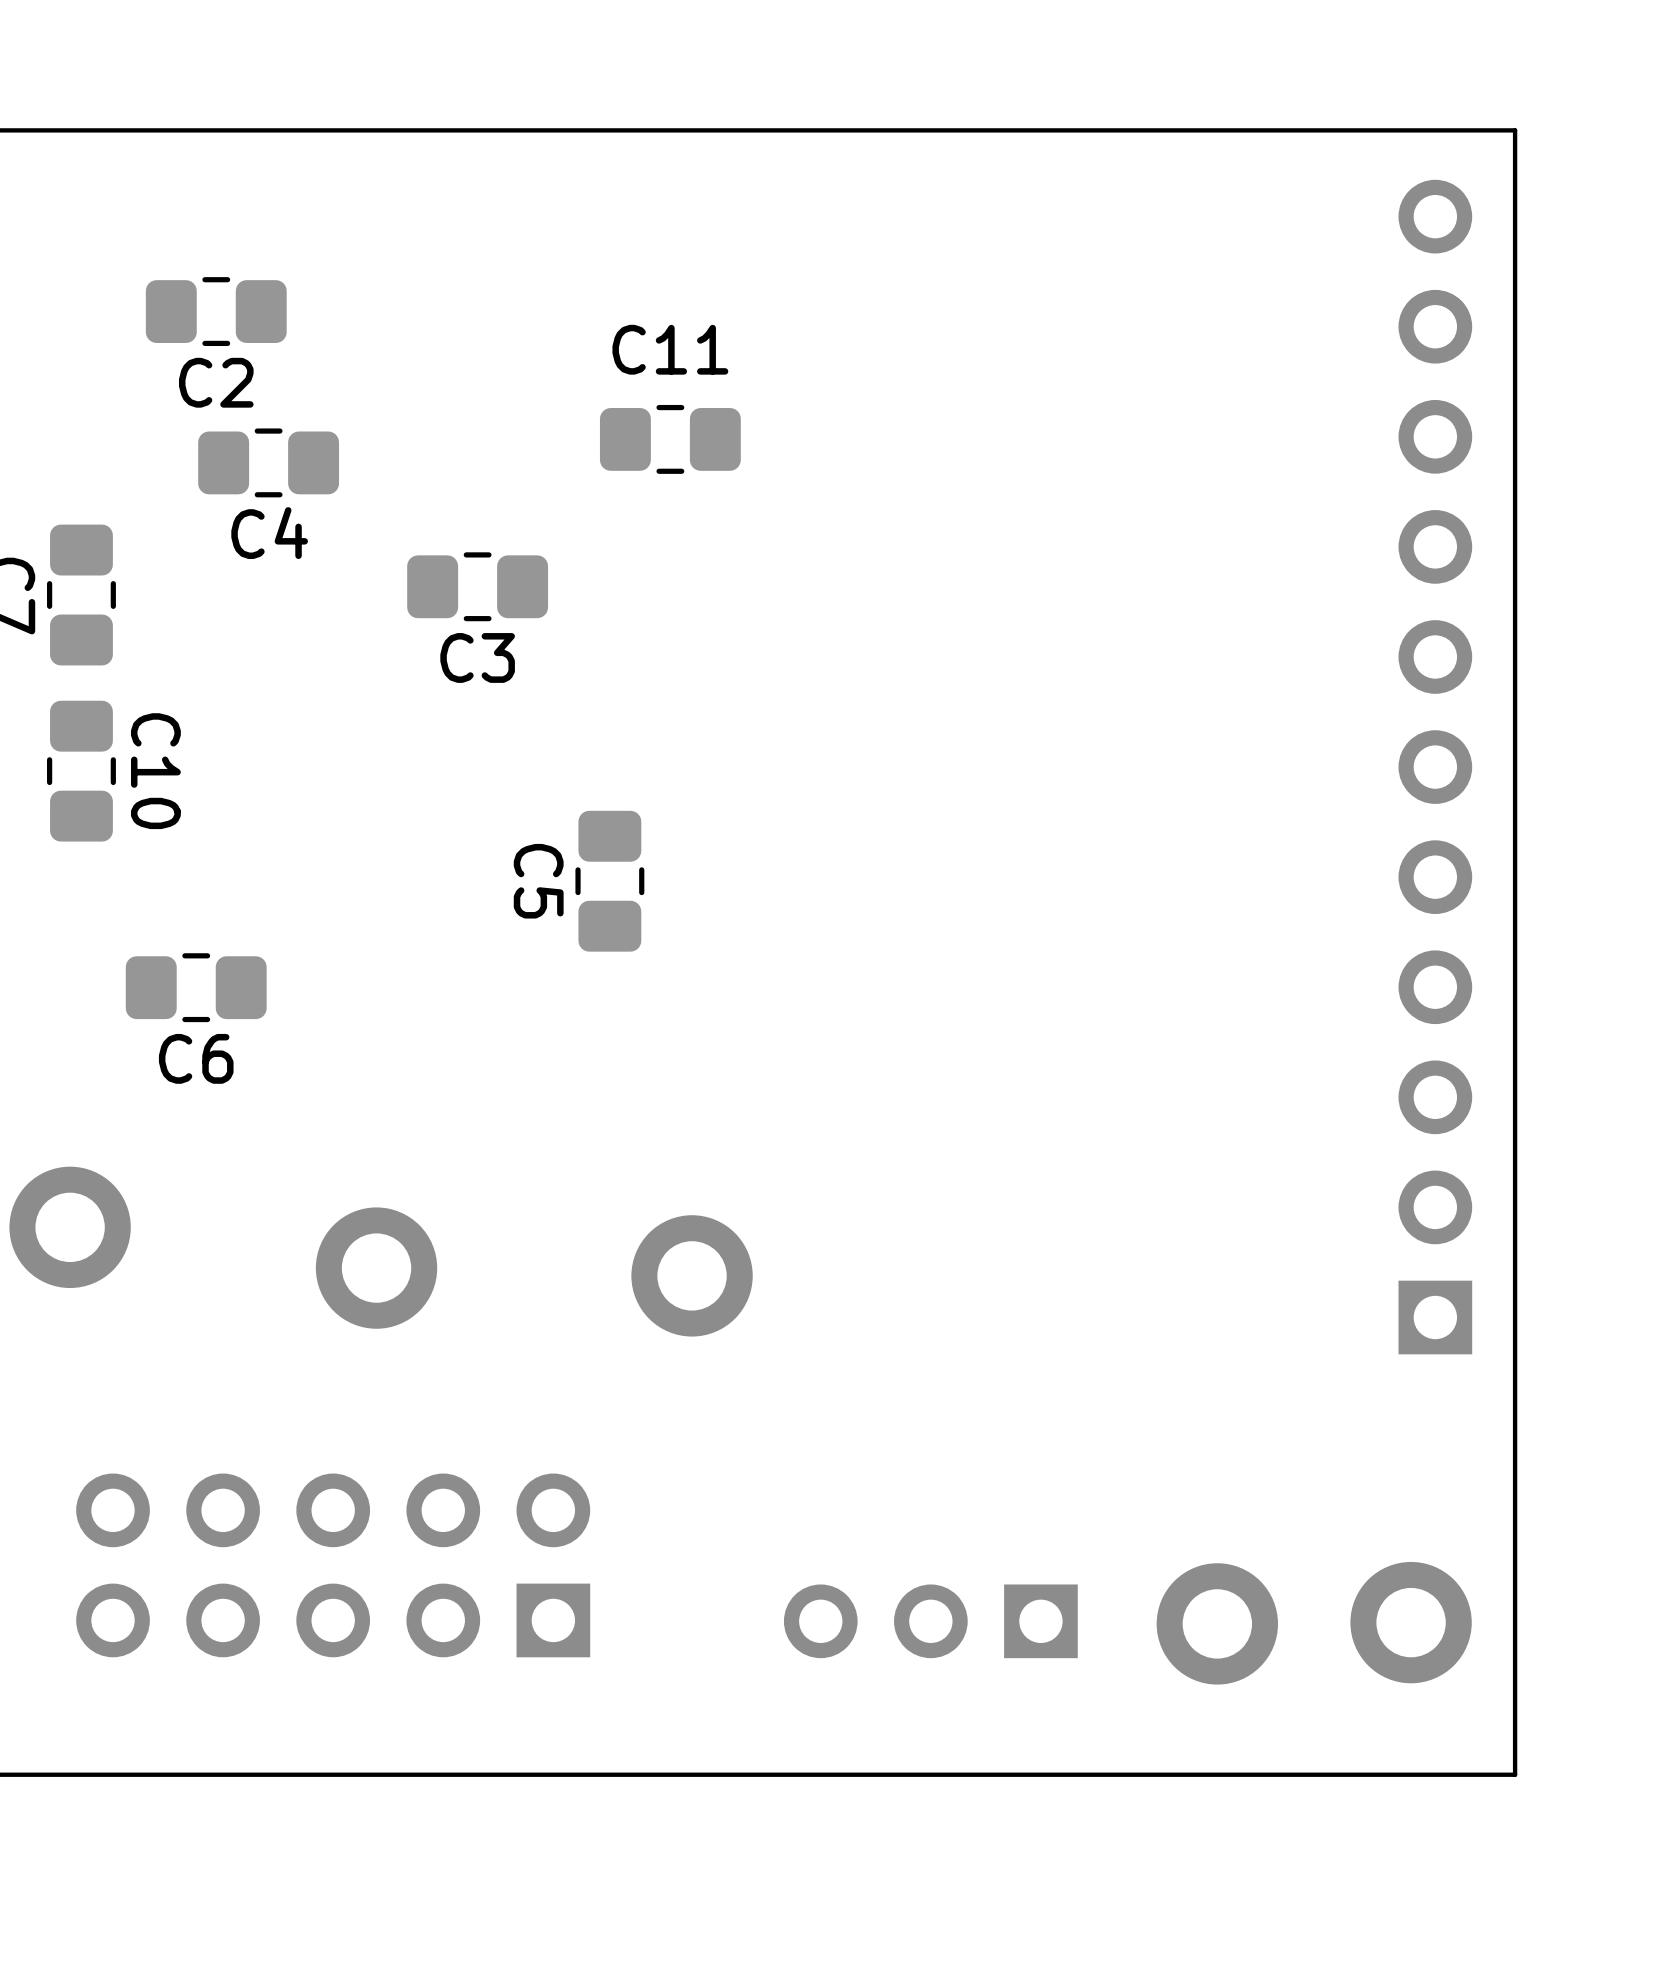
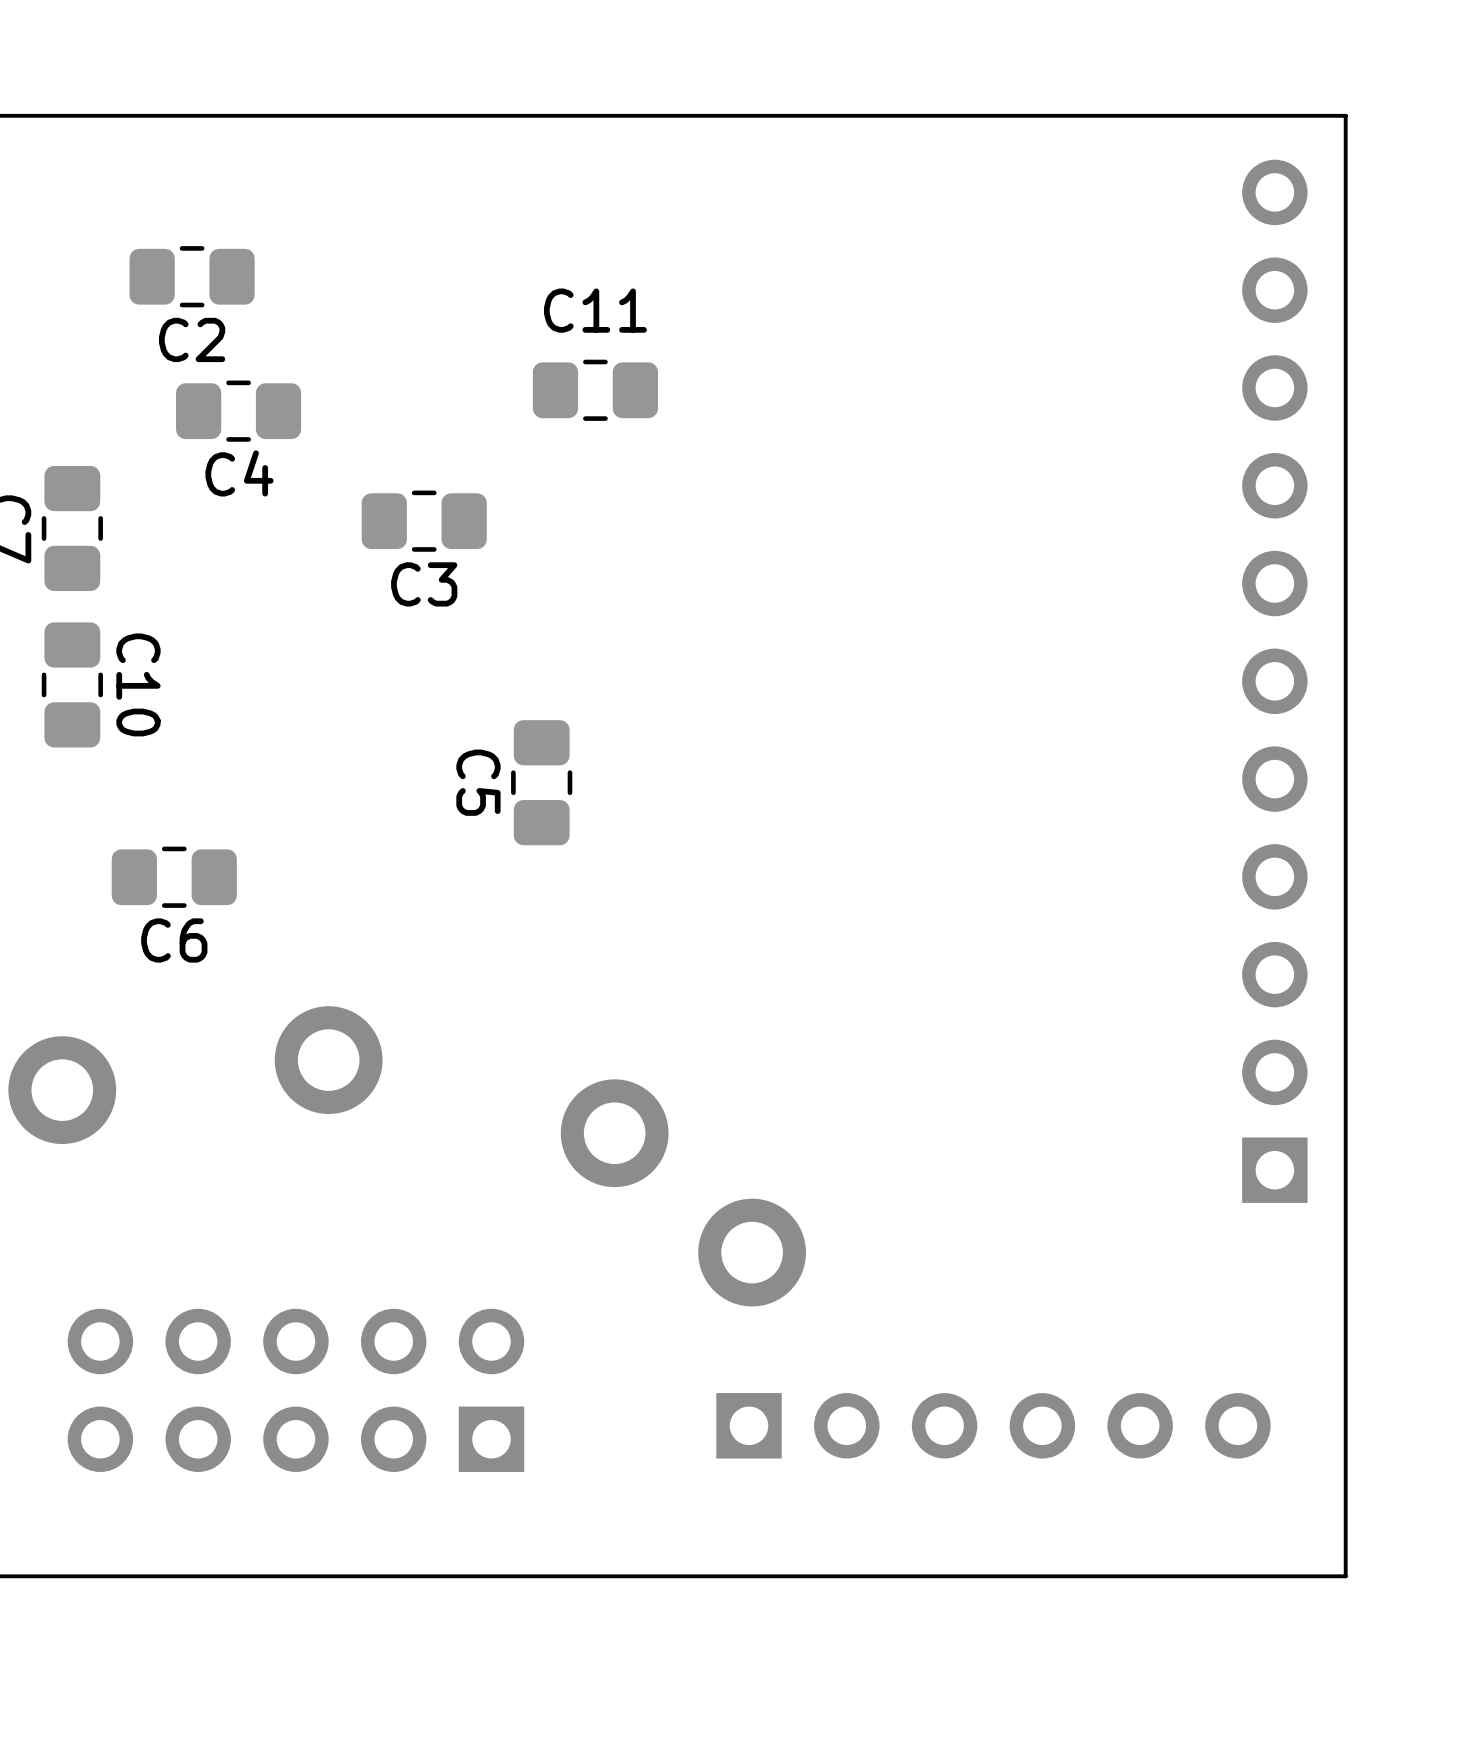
part position: (376, 1268) -> (328, 1060)
part: none -> (752, 1252)
part: none -> (993, 1425)
part: (930, 1621) -> none
part: (1411, 1622) -> none
part: (1217, 1623) -> none

